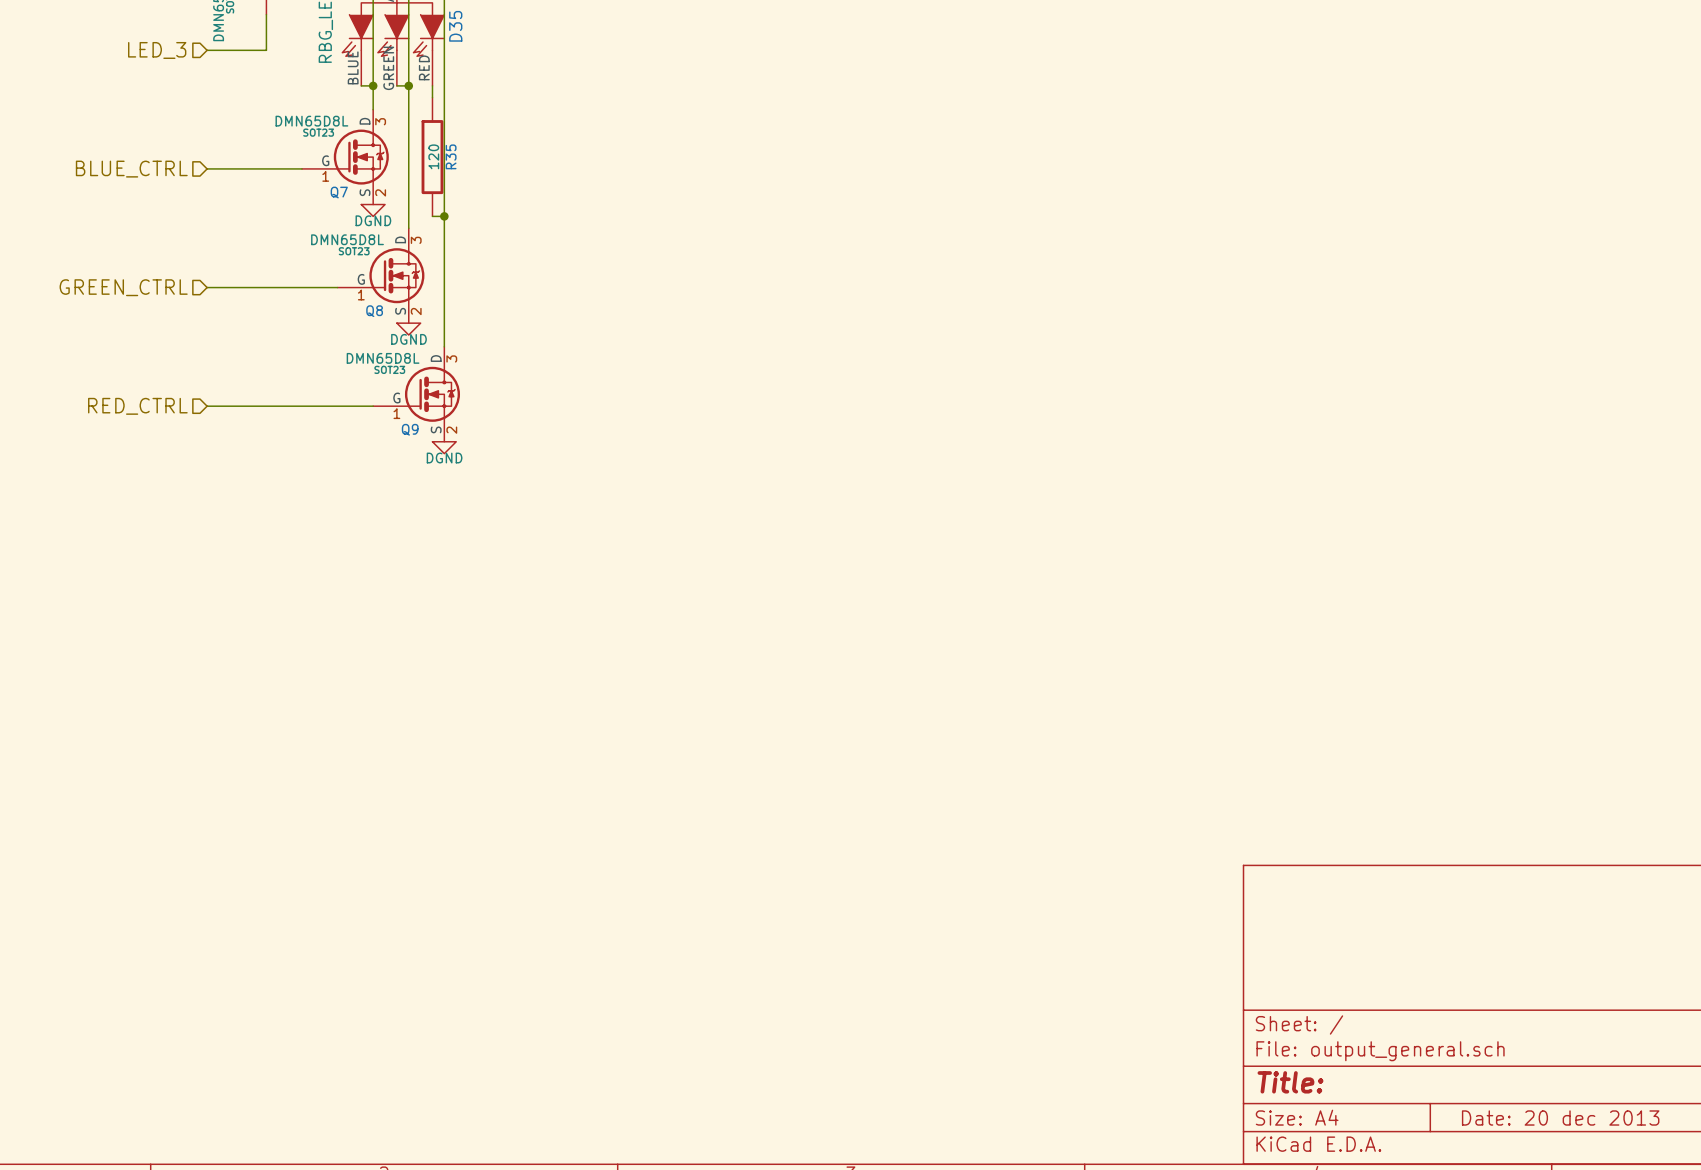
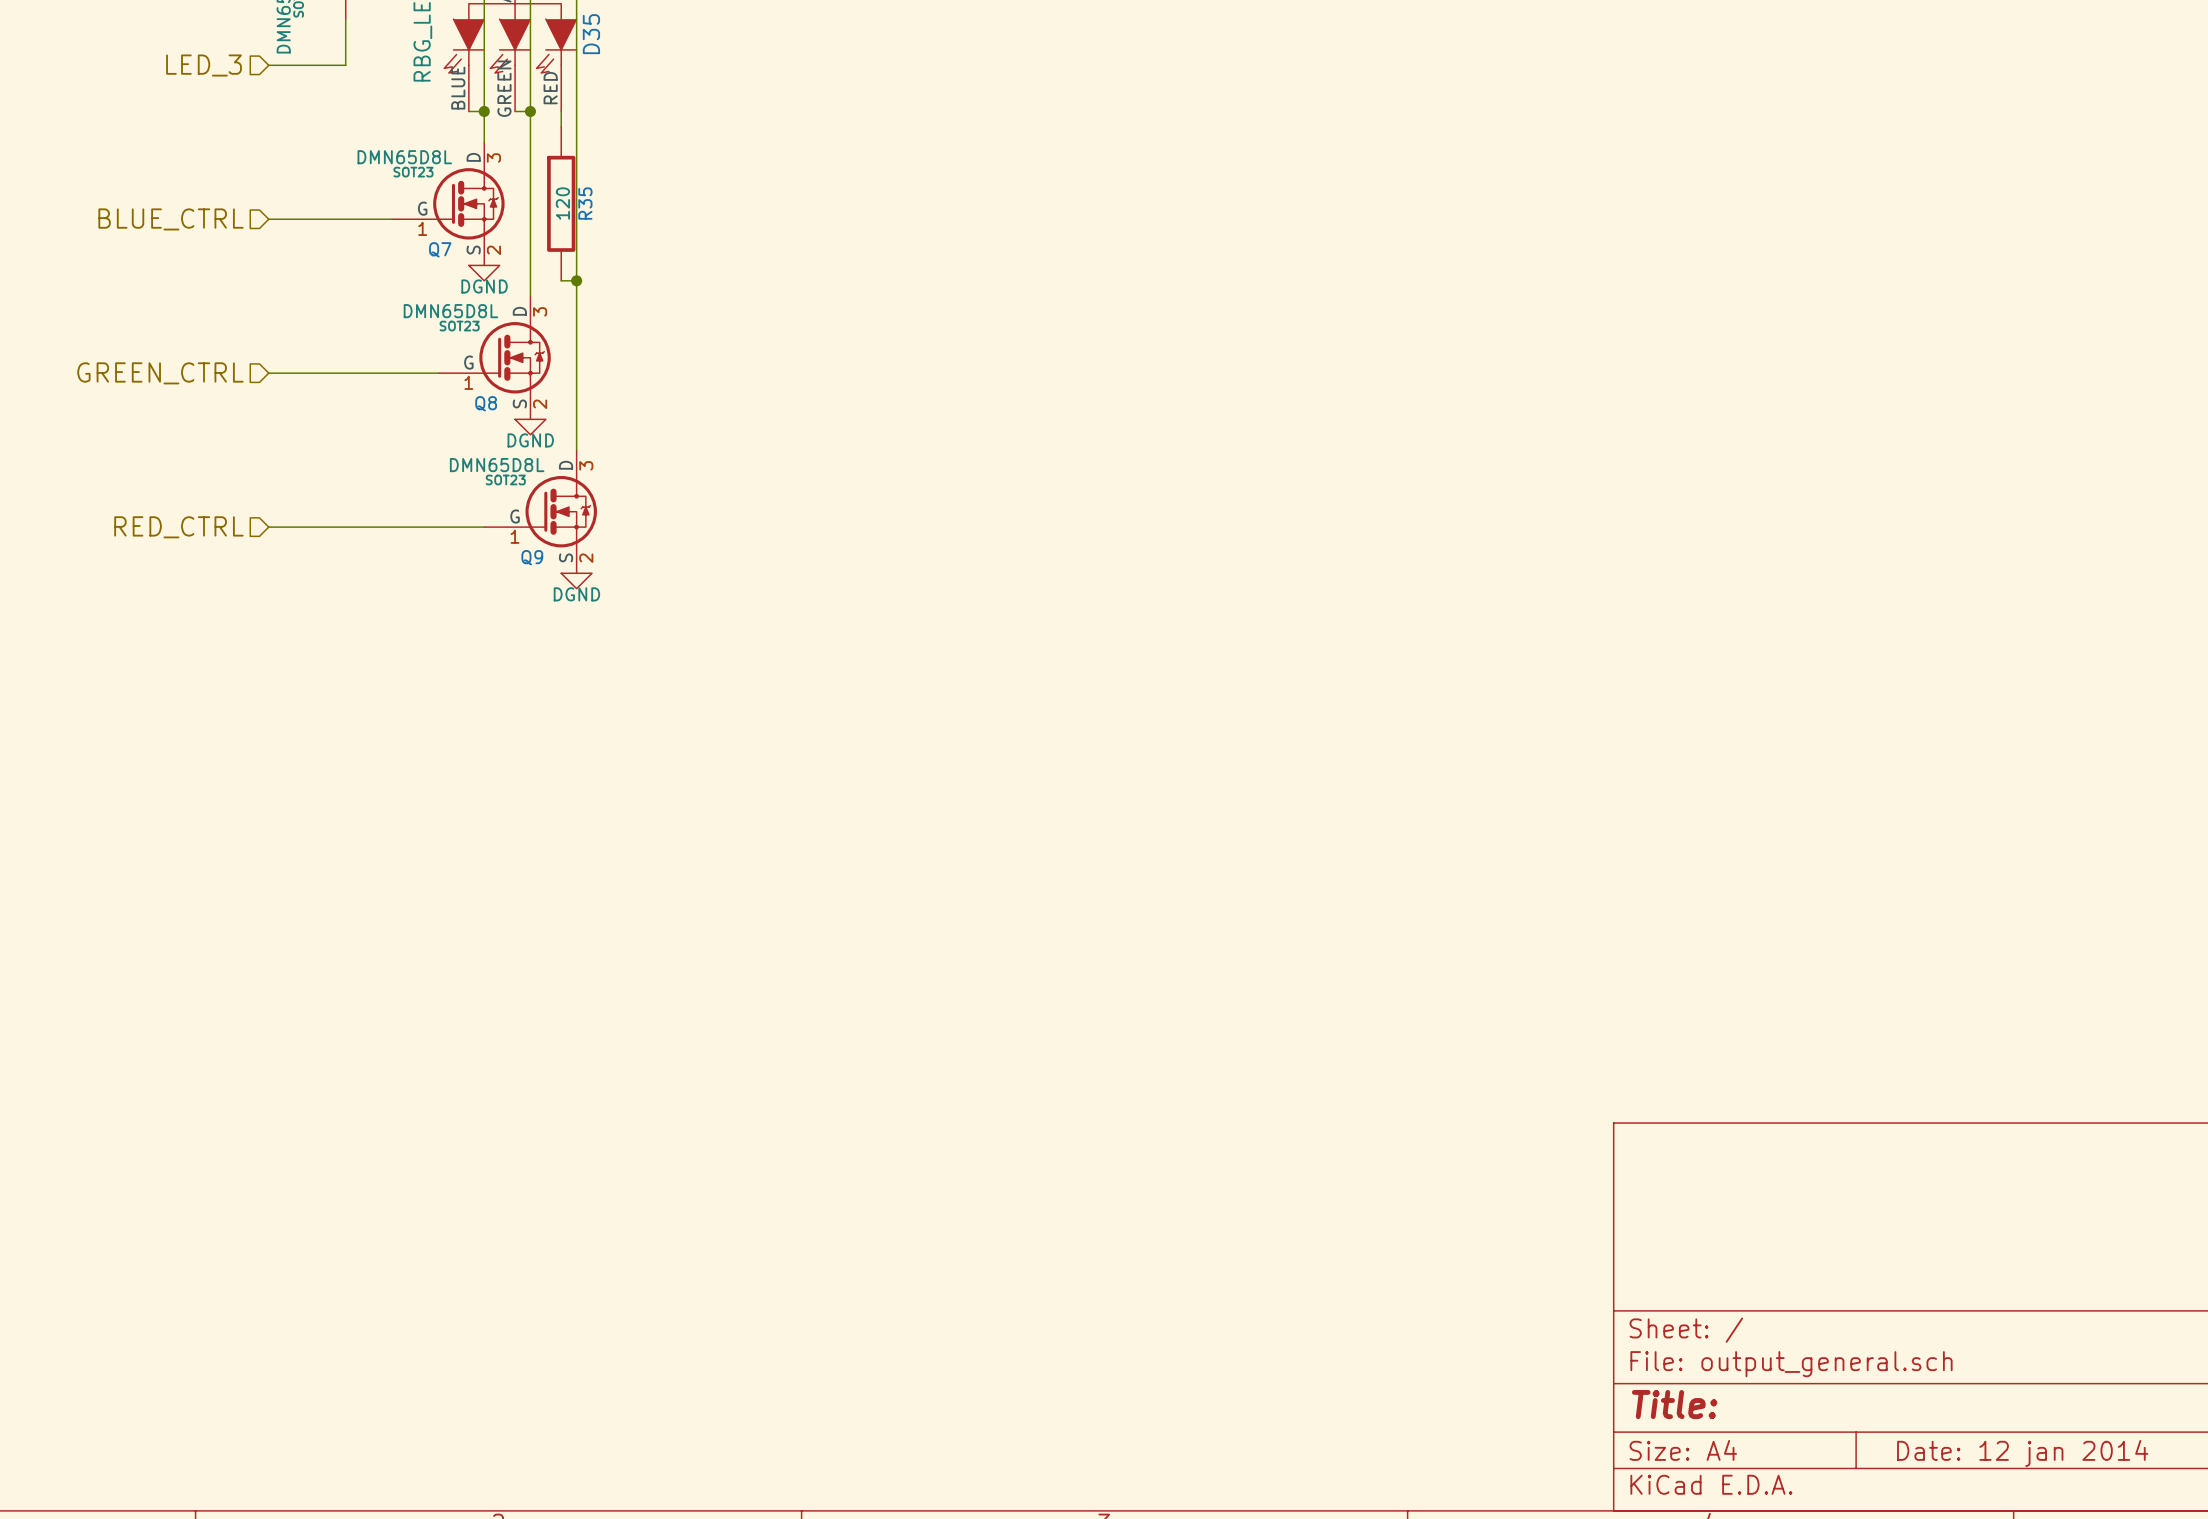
title block: Date: 20 dec 2013 (1560, 1118) -> Date: 12 jan 2014 (2022, 1453)

